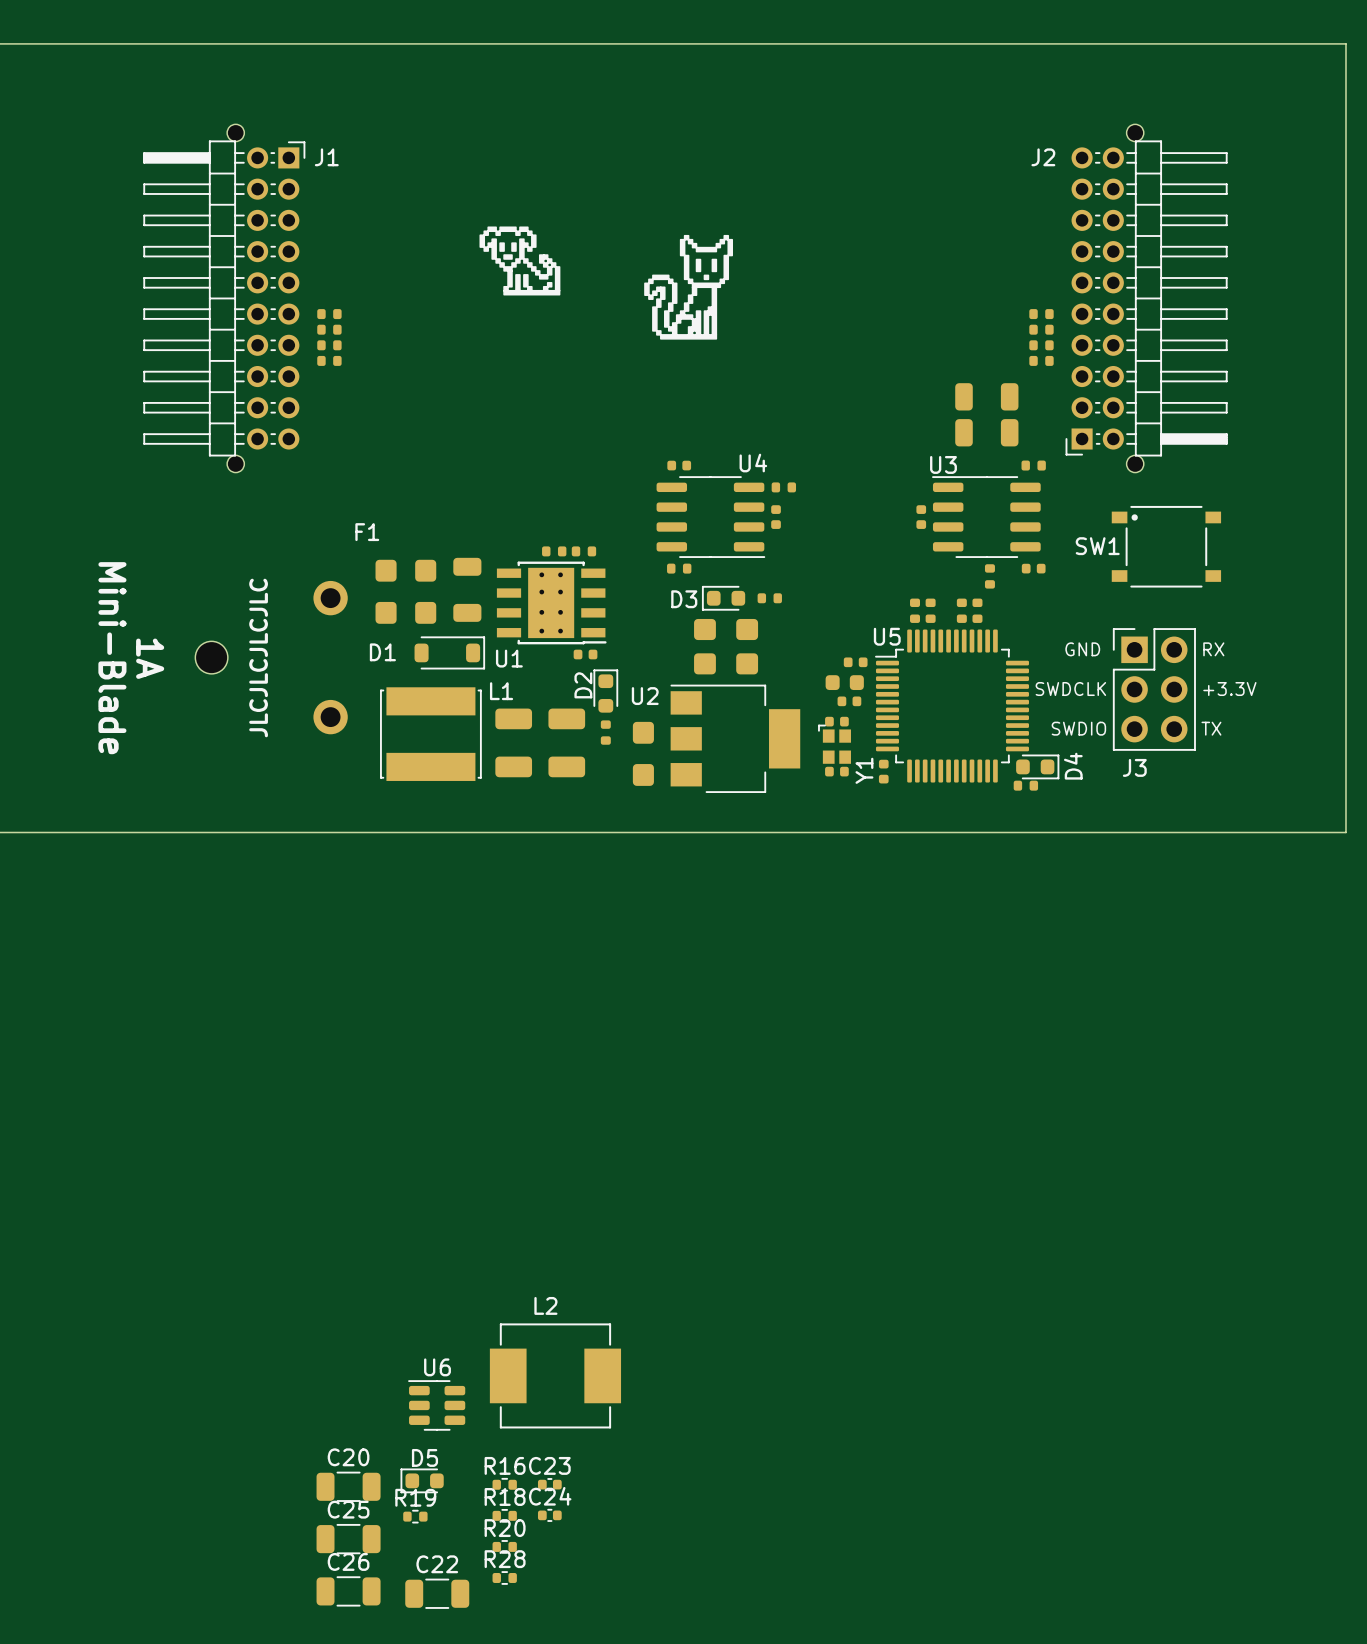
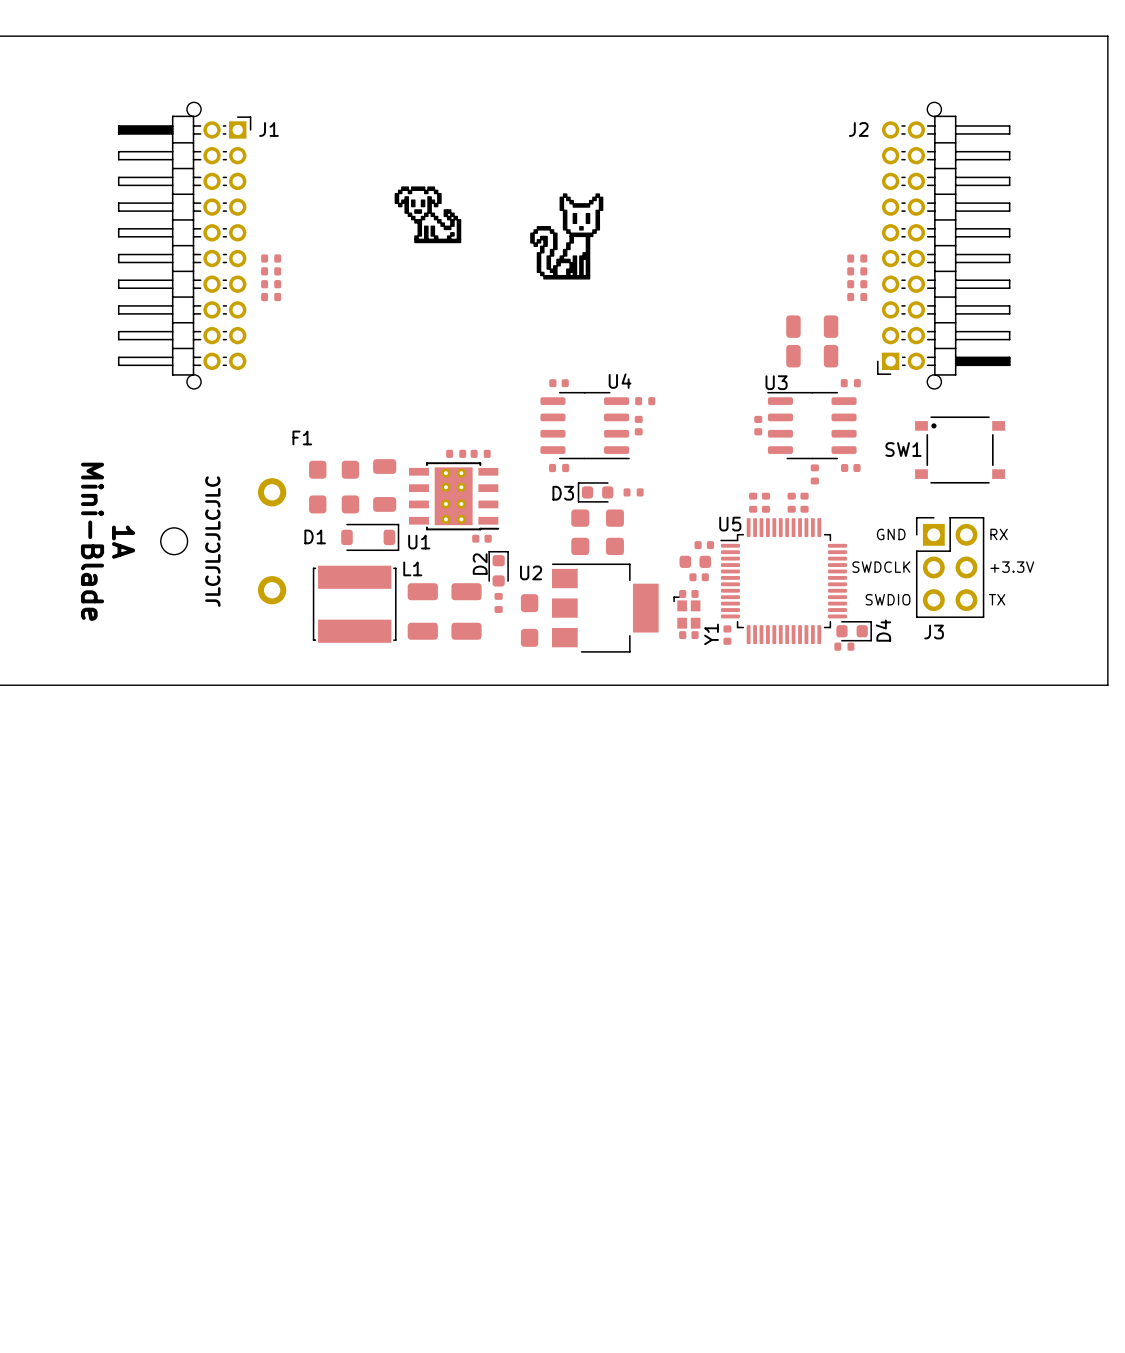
L2: (555, 1375) -> none
U6: (436, 1405) -> none
D5: (422, 1480) -> none
R16: (504, 1484) -> none
C23: (549, 1484) -> none
C20: (348, 1486) -> none
R18: (504, 1515) -> none
C24: (549, 1515) -> none
R19: (415, 1516) -> none
C25: (348, 1539) -> none
R20: (504, 1546) -> none
R28: (504, 1577) -> none
C26: (348, 1591) -> none
C22: (437, 1593) -> none

